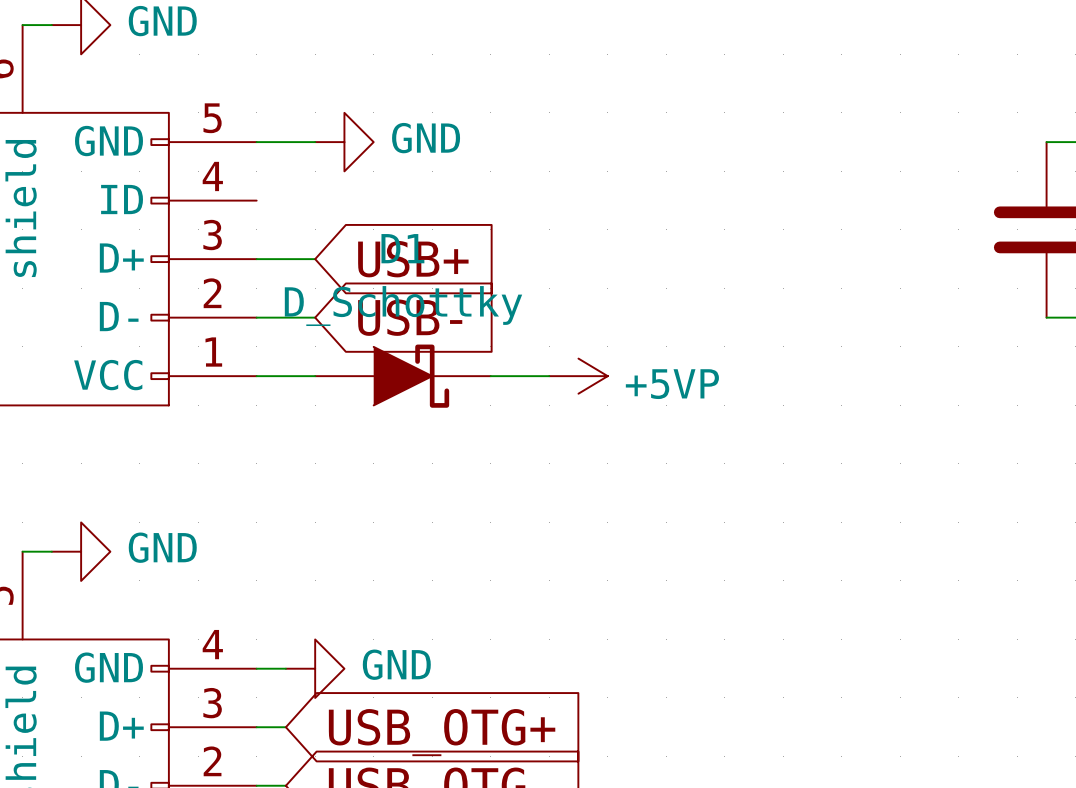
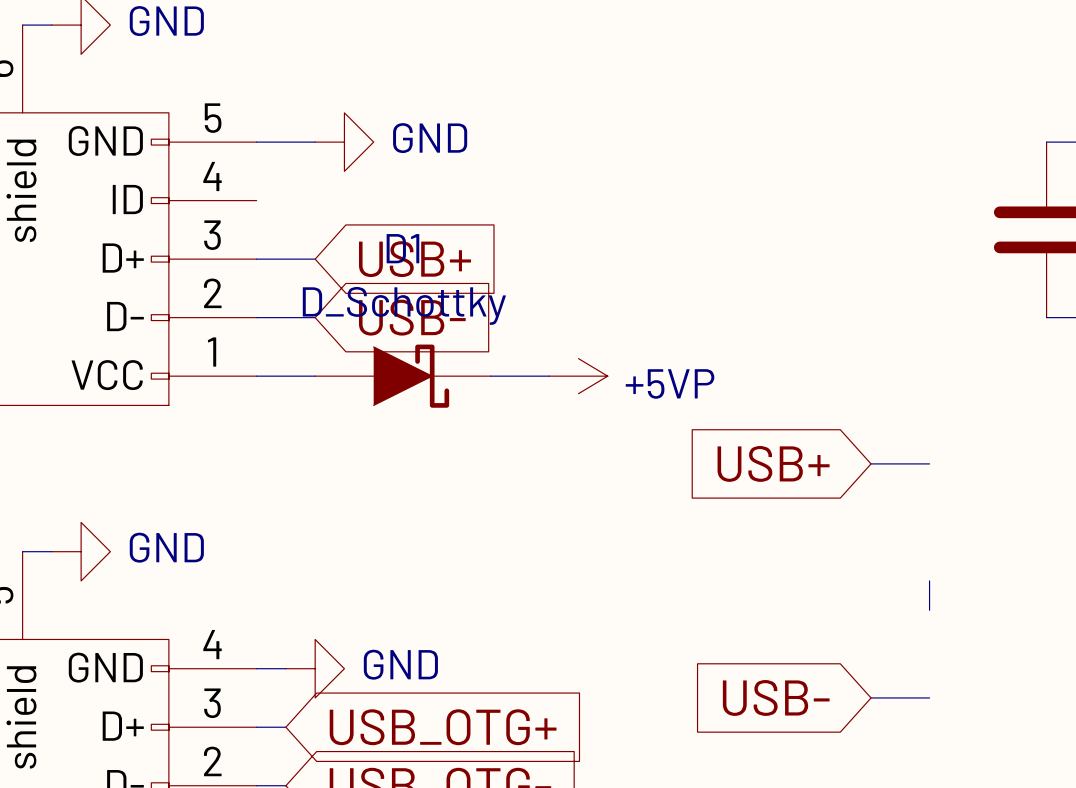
global label: none -> USB+ (773, 463)
wire: none -> (871, 463) (929, 463)
wire: none -> (929, 580) (929, 610)
wire: none -> (871, 697) (929, 697)
global label: none -> USB- (776, 697)

